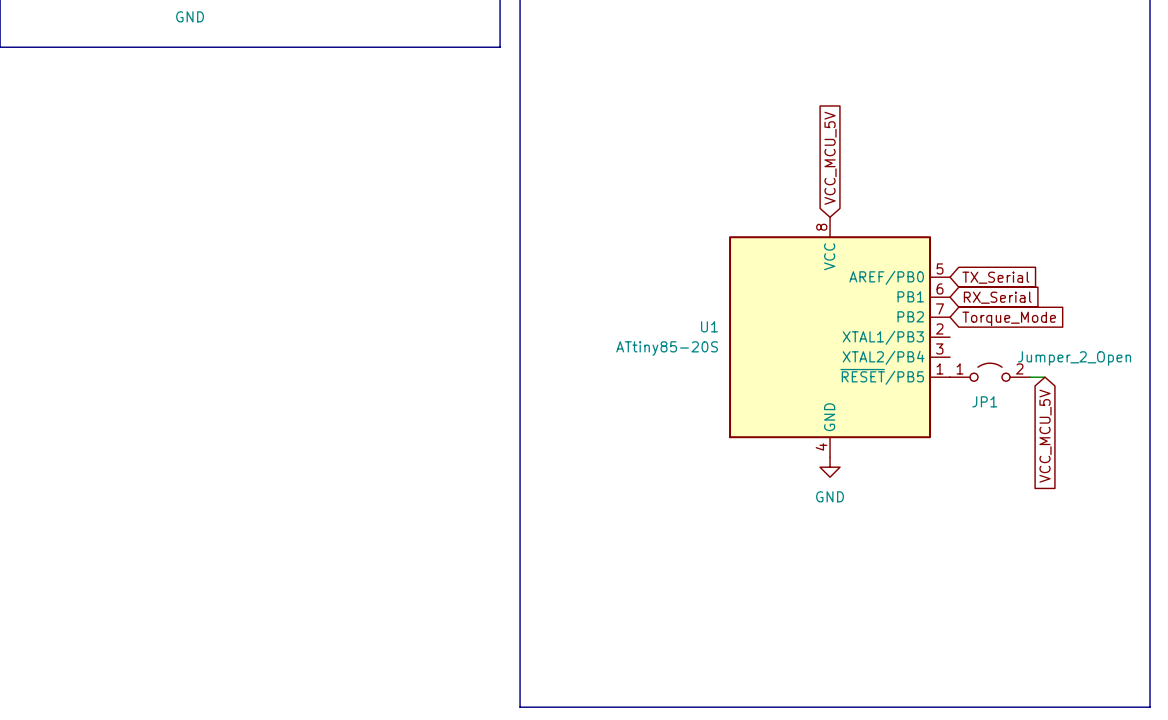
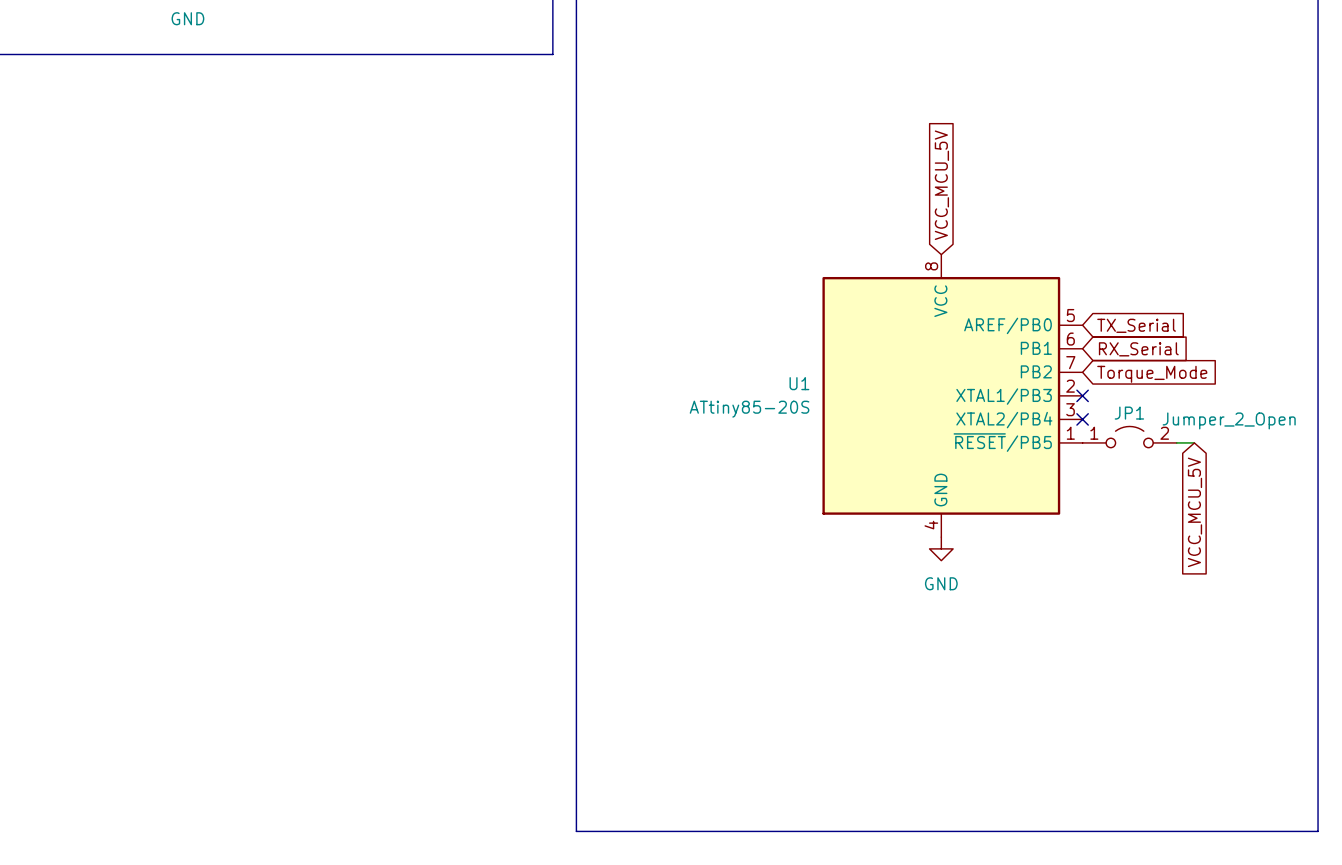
no-connect mark: none -> (1082, 395)
no-connect mark: none -> (1082, 419)
JP1 name position: JP1 (984, 401) -> JP1 (1129, 413)

